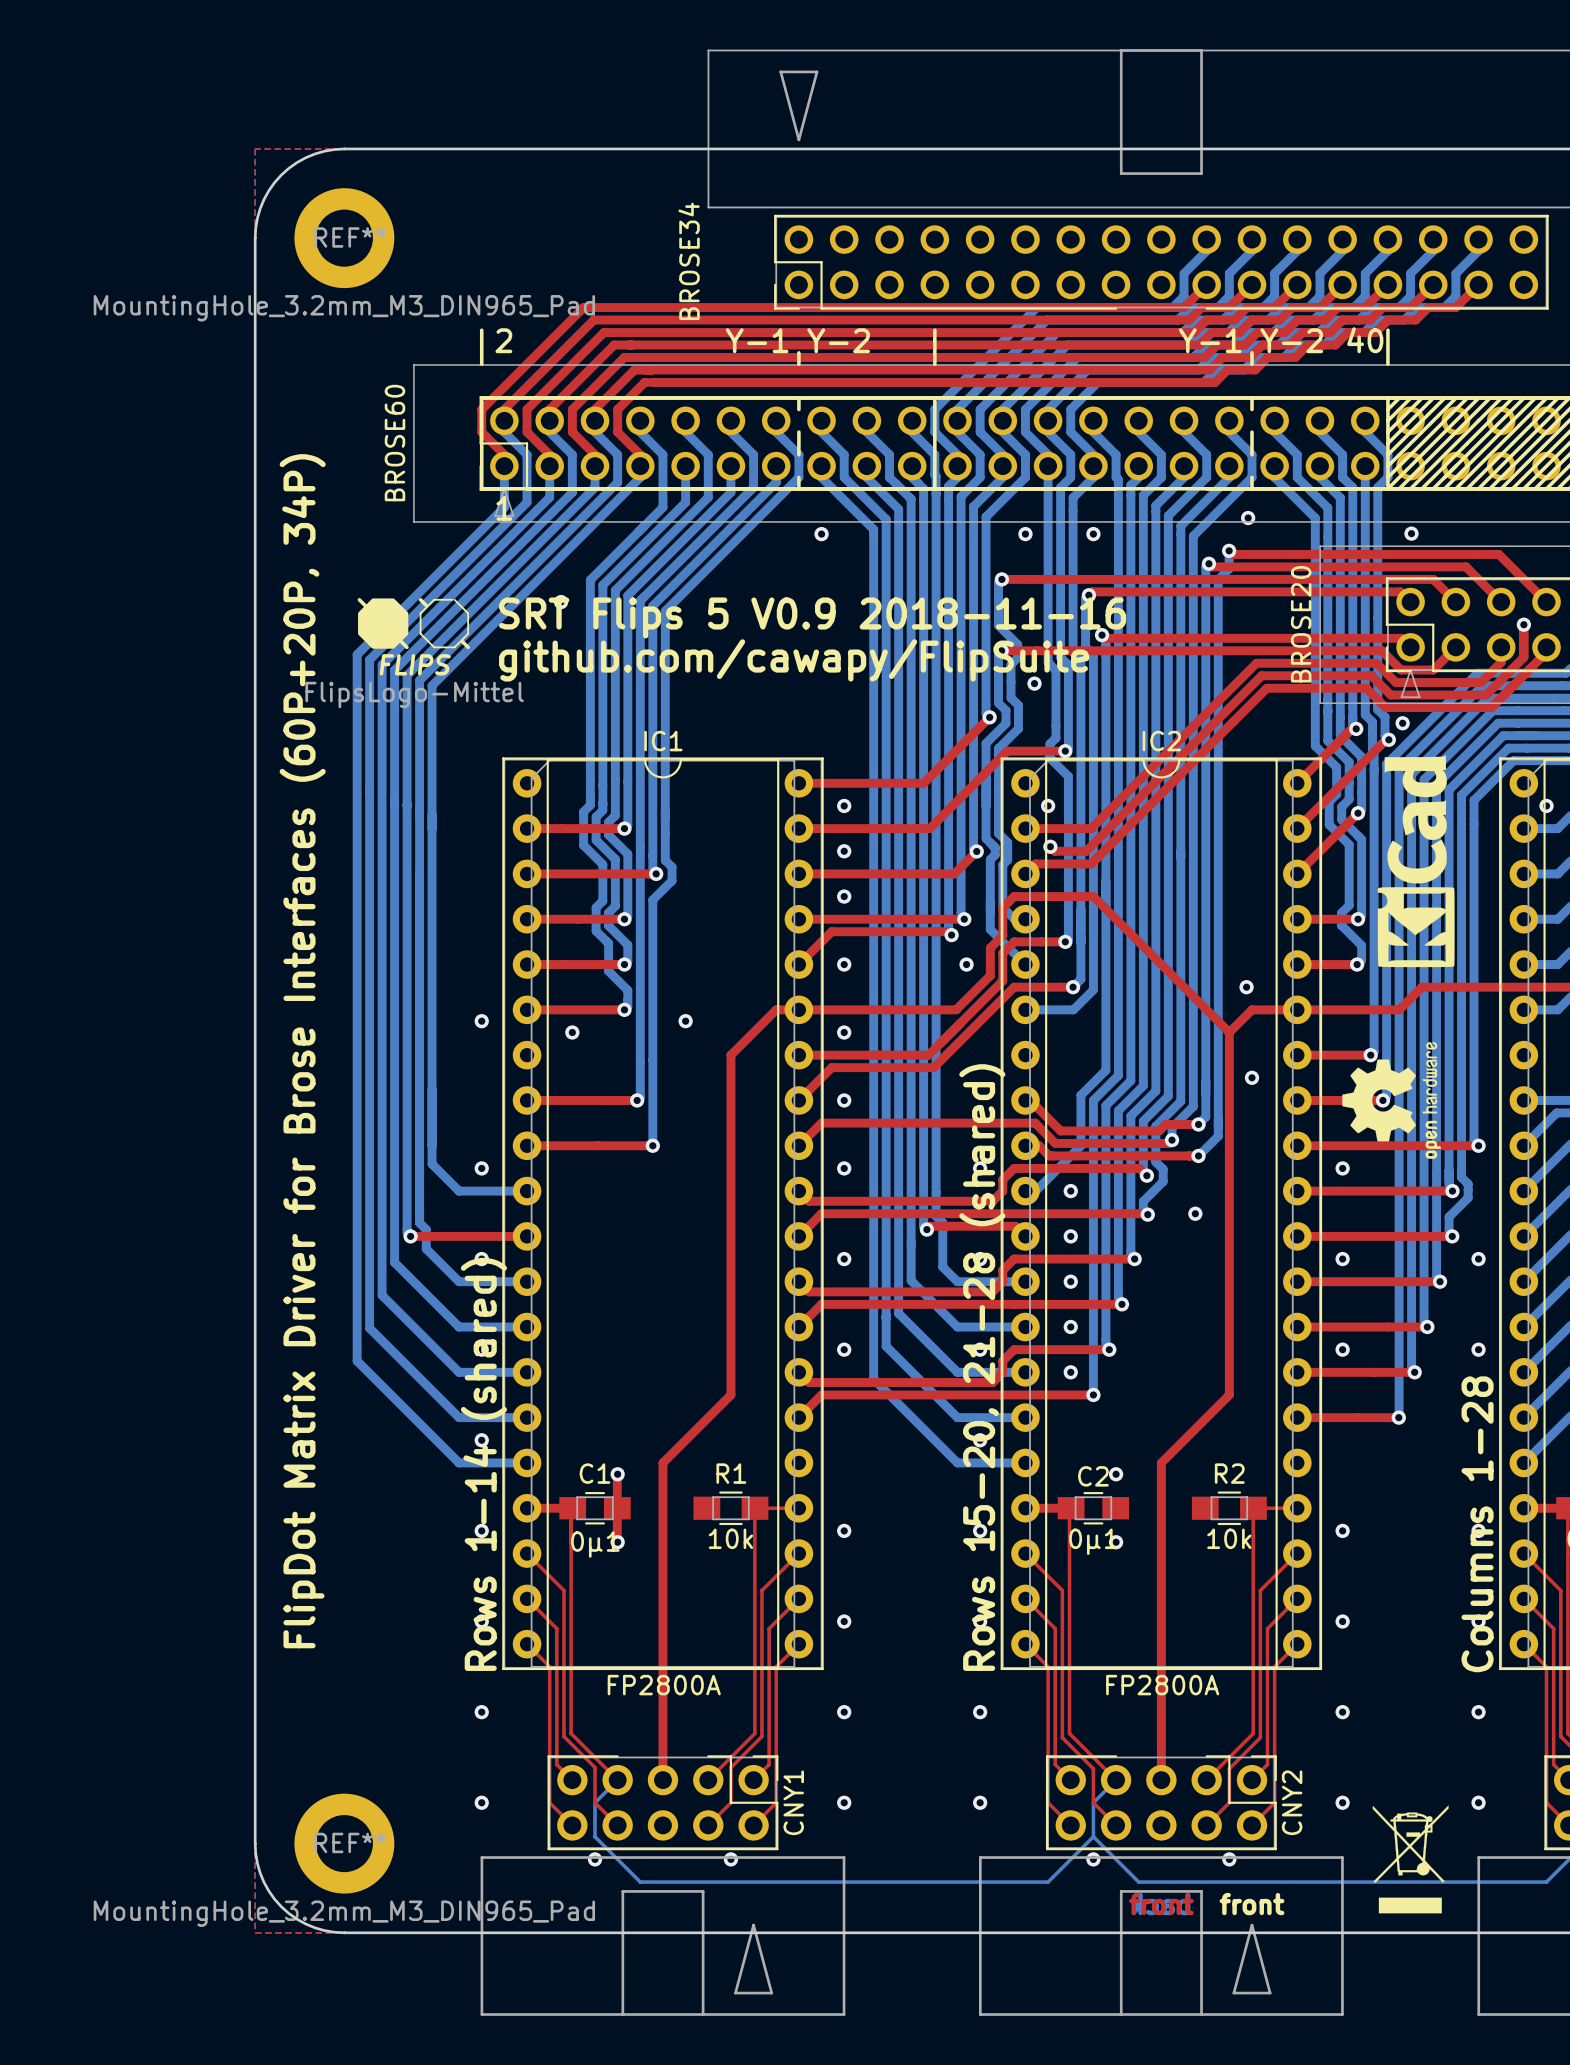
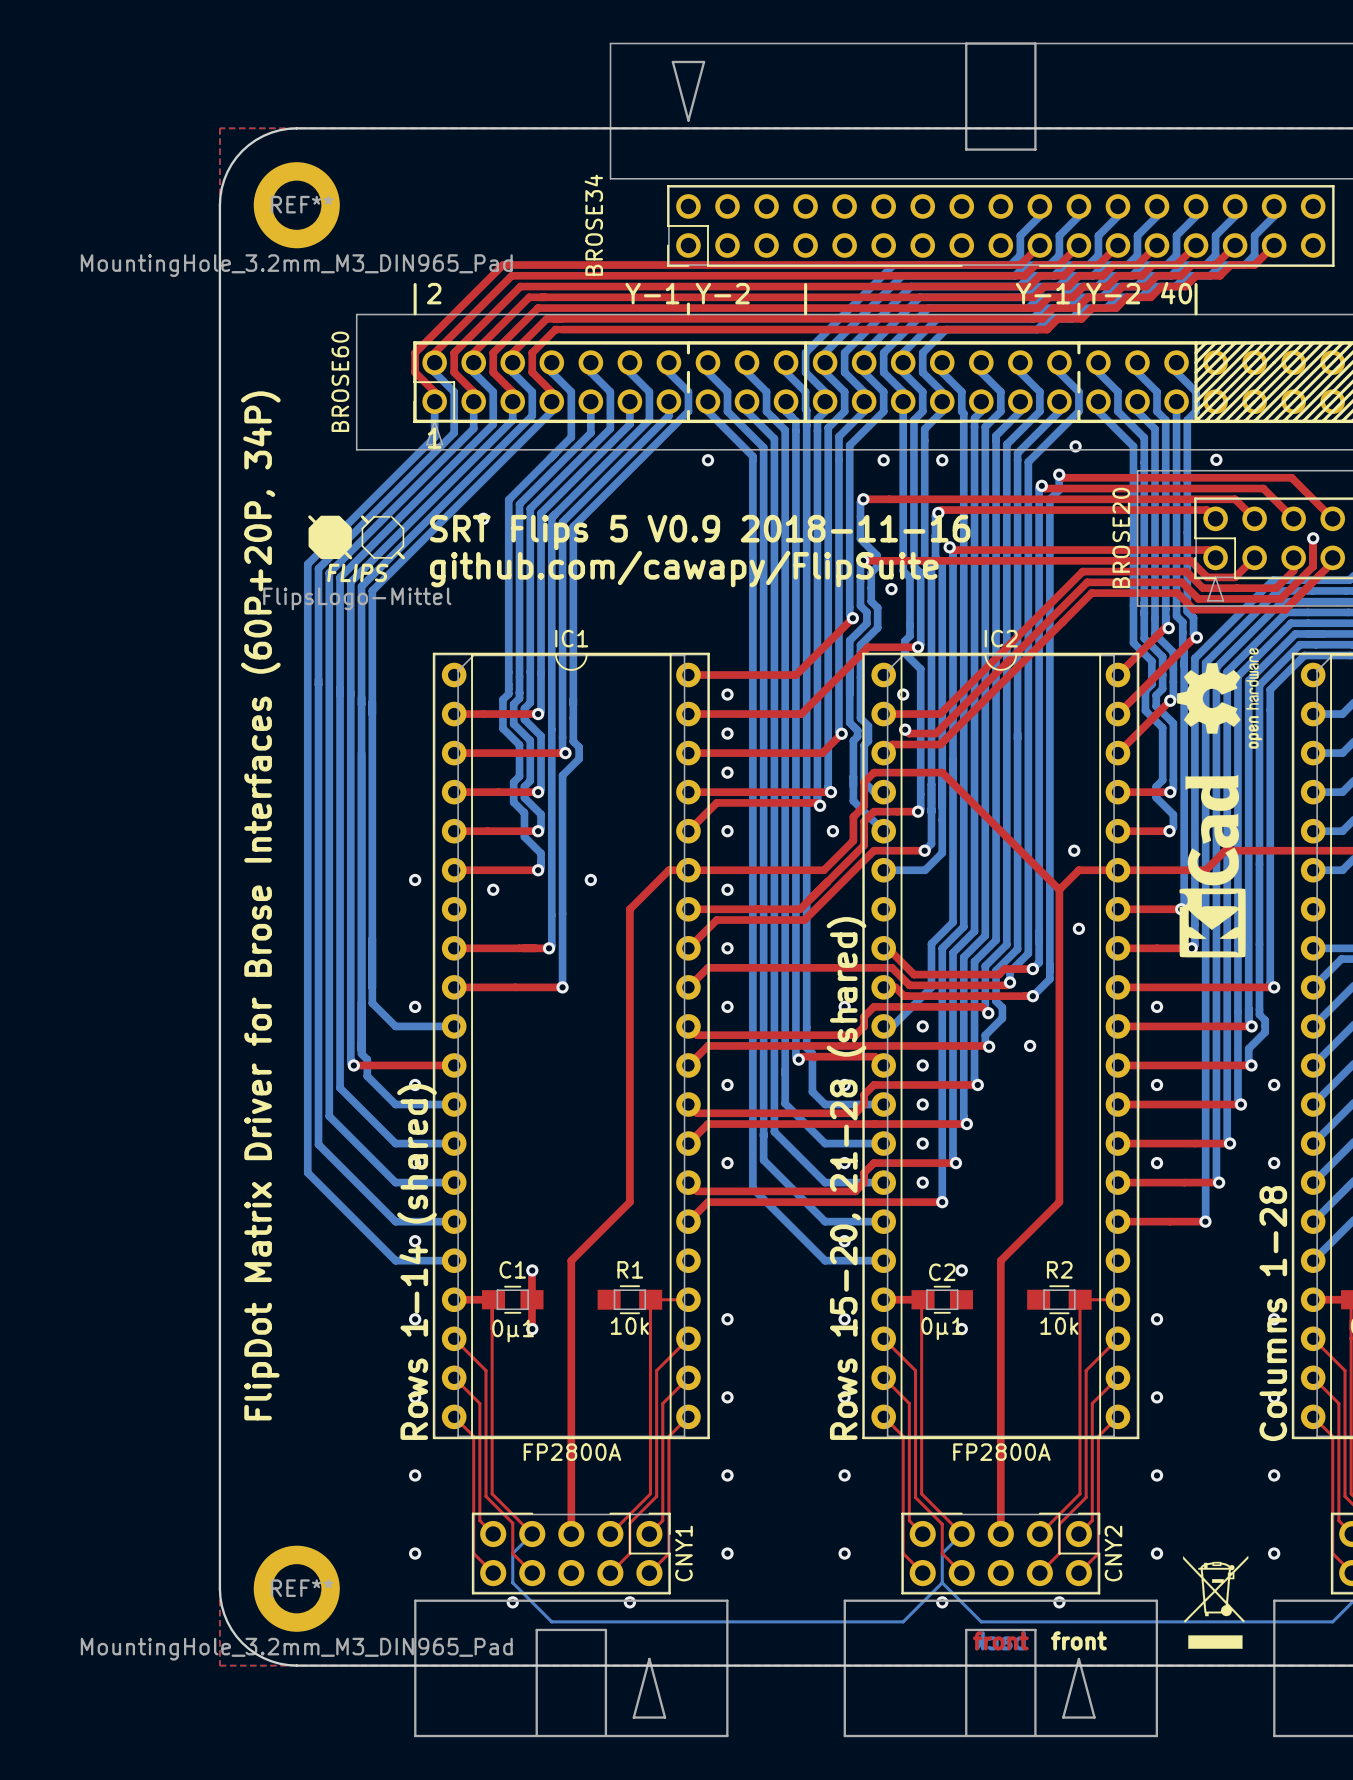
via: (1402, 723) -> none
via: (1546, 805) -> none
drawing position: (1416, 861) -> (1212, 866)
drawing position: (1391, 1100) -> (1219, 698)

